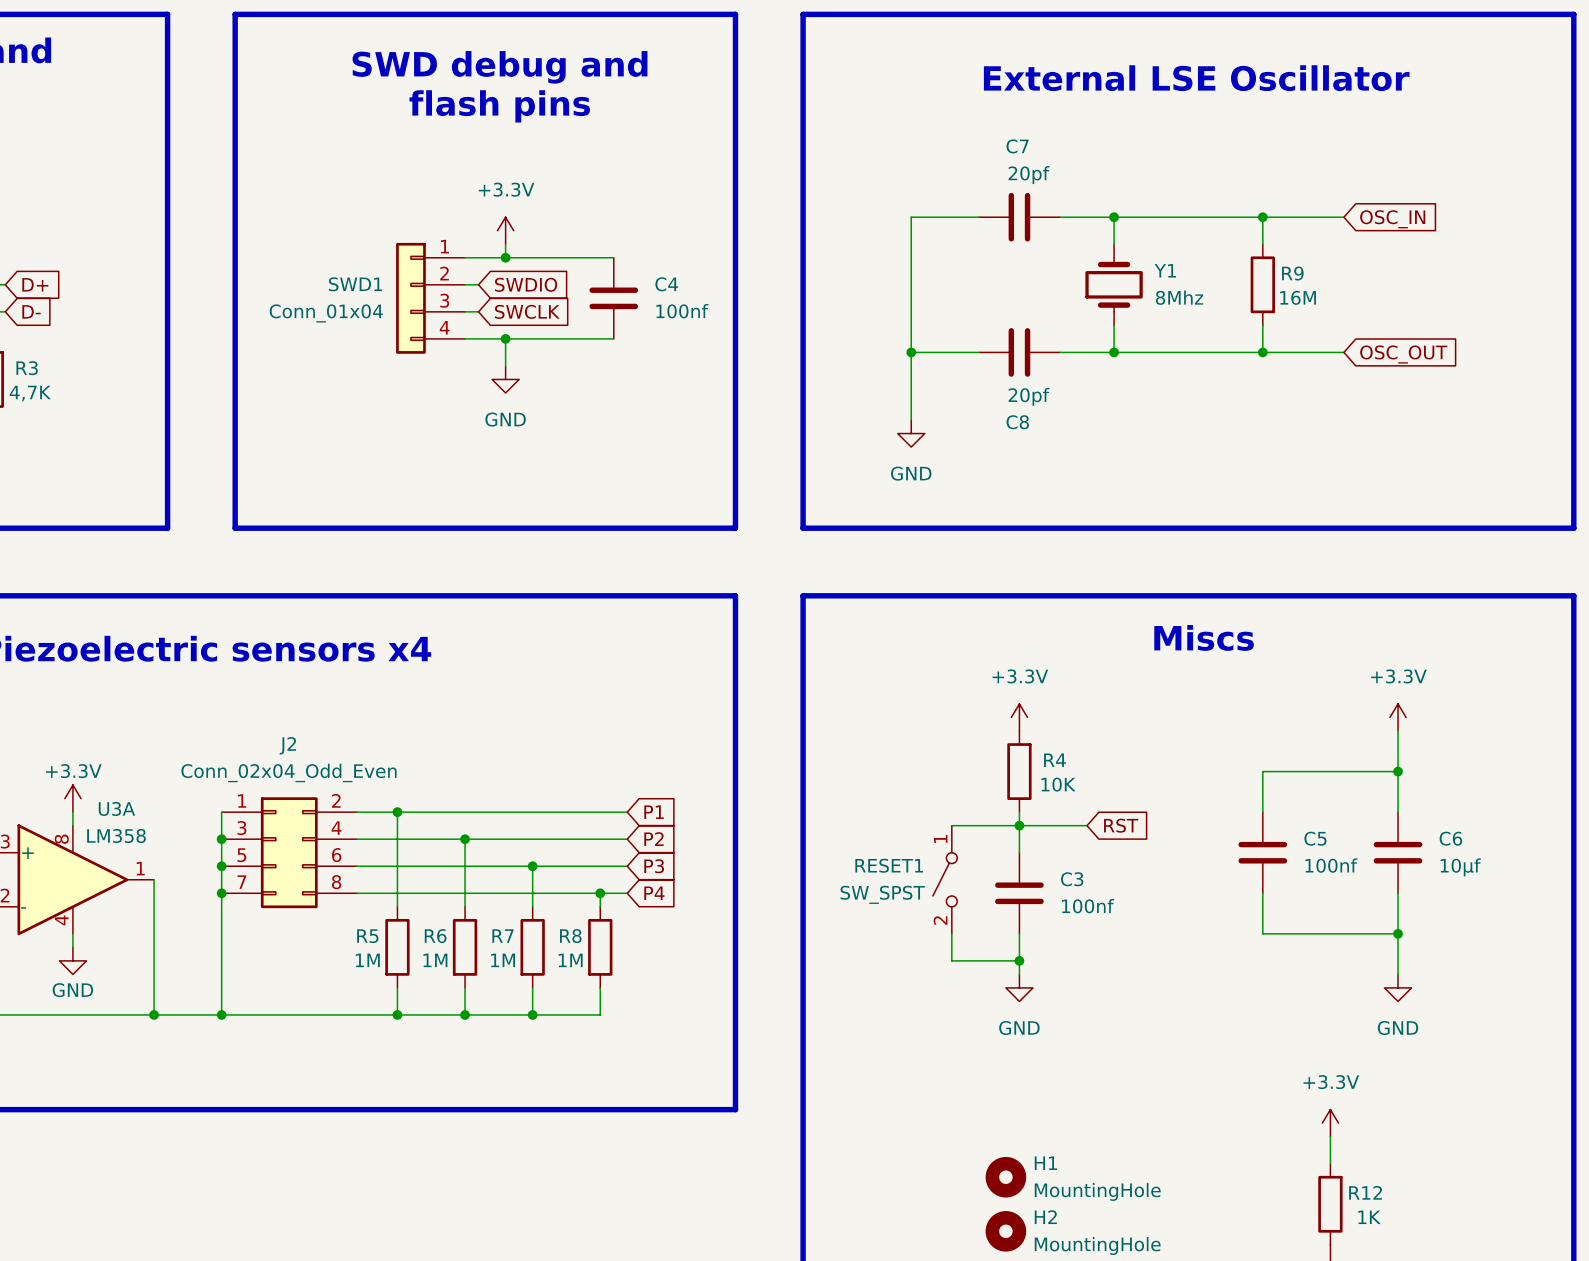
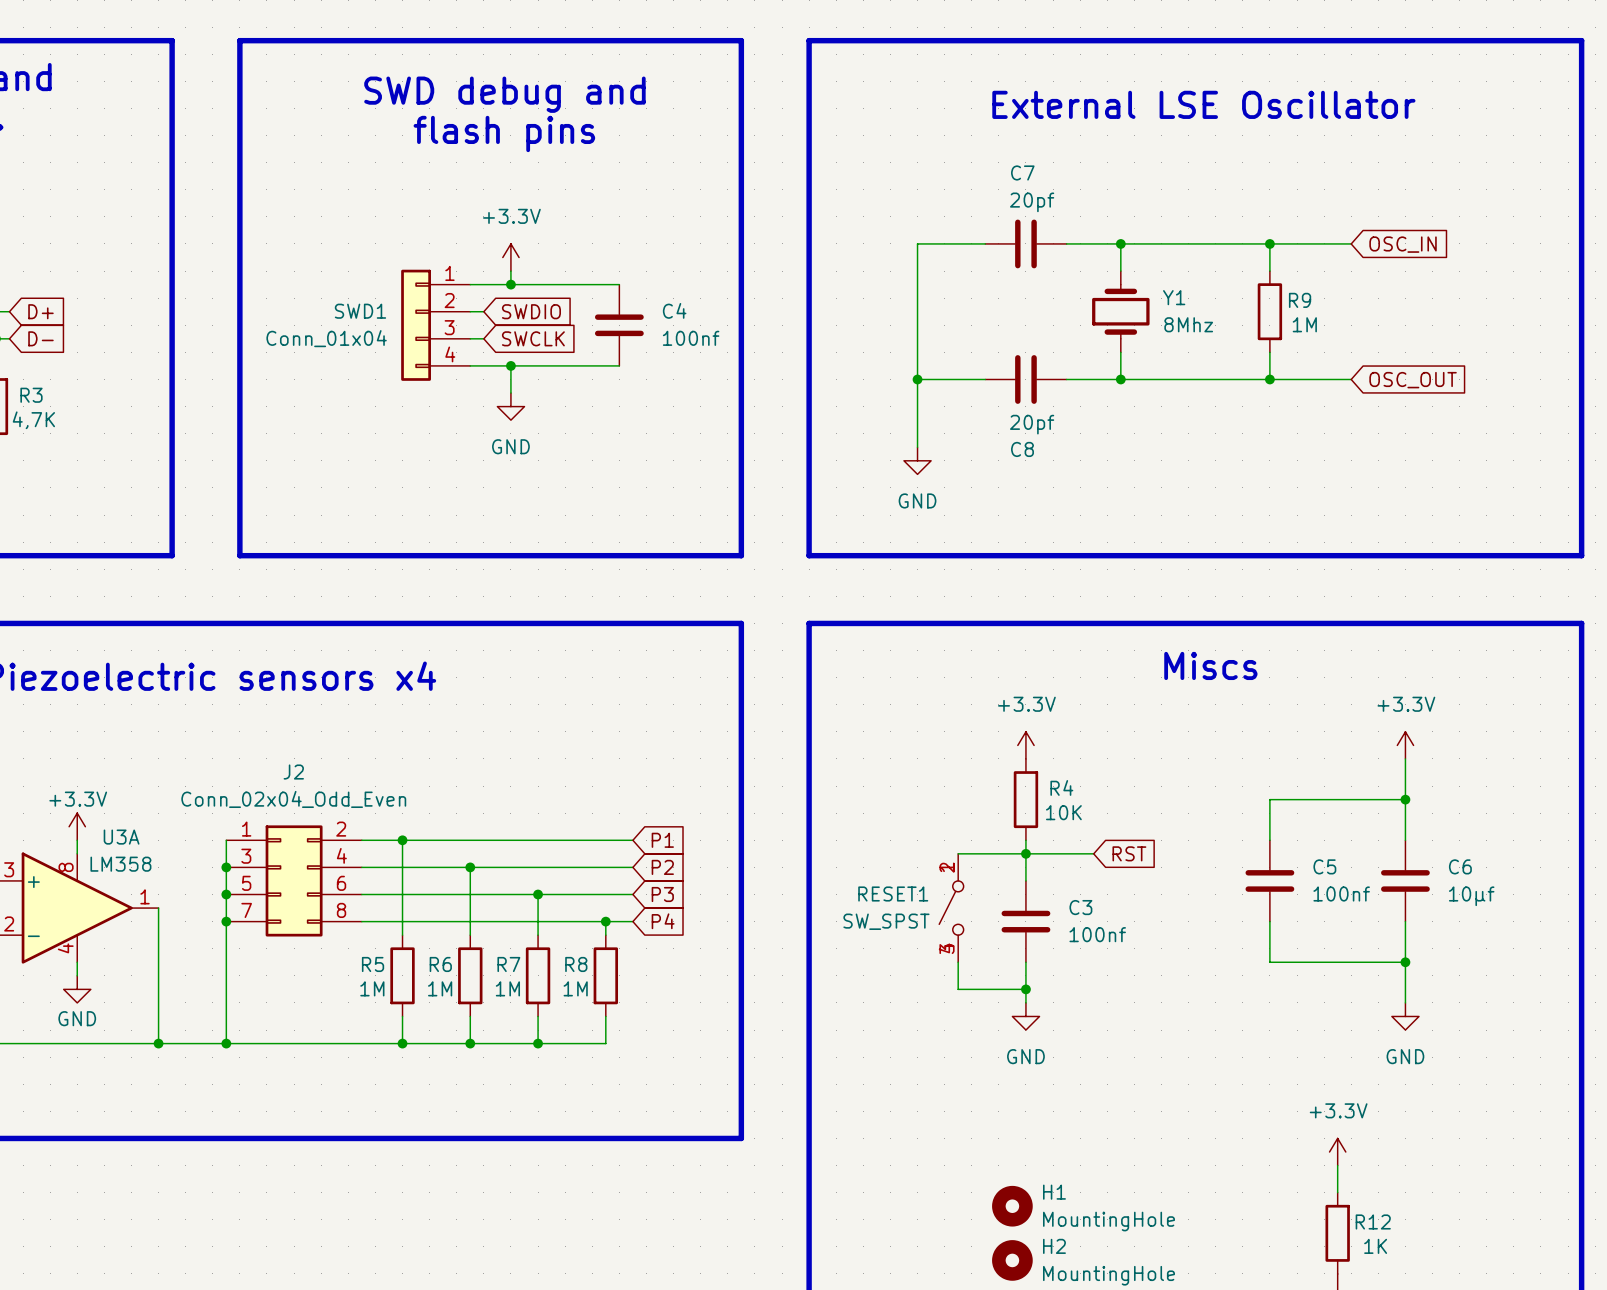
R9 value: 16M (1298, 297) -> 1M (1304, 324)
RESET1 symbol: [932, 825, 958, 934] -> [939, 853, 964, 963]

